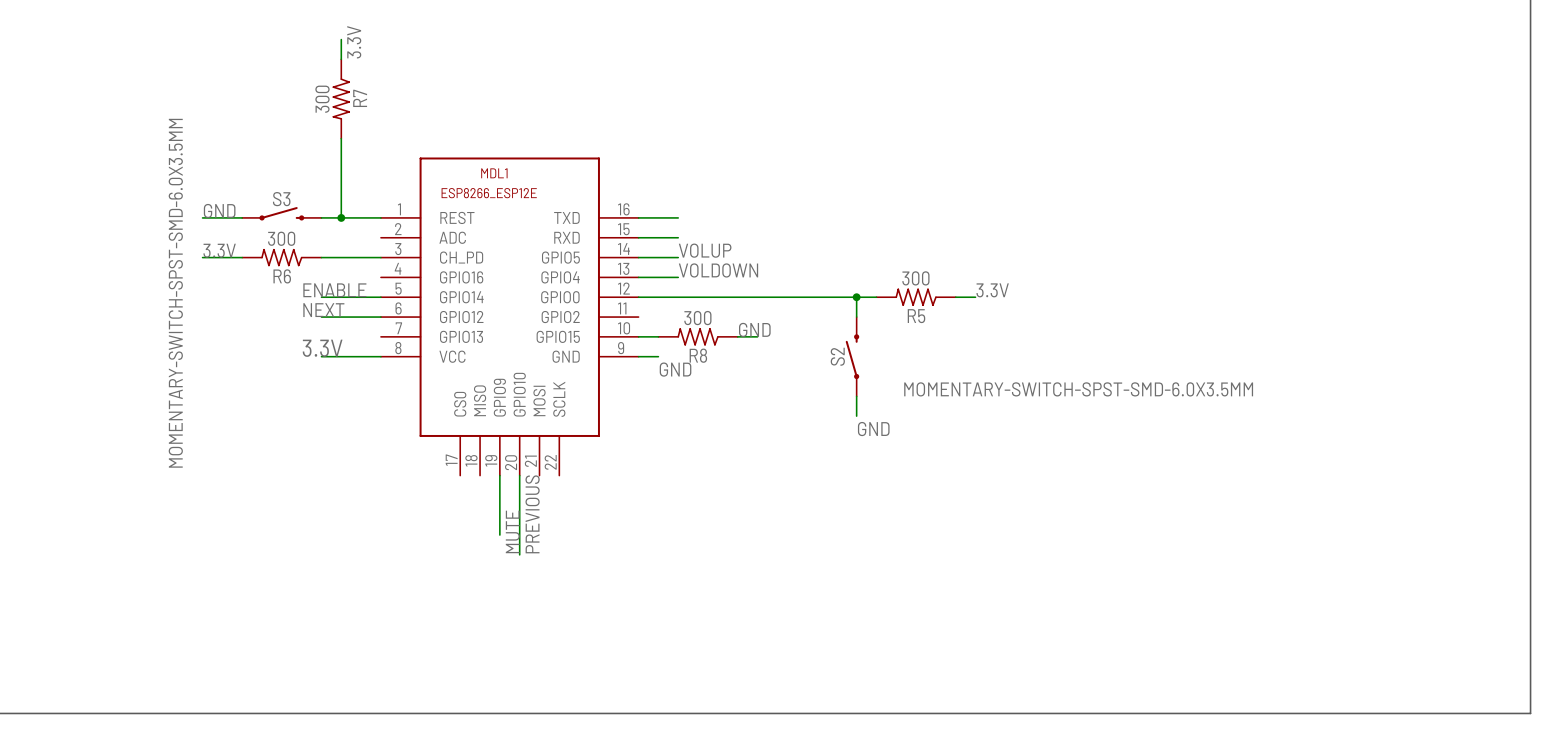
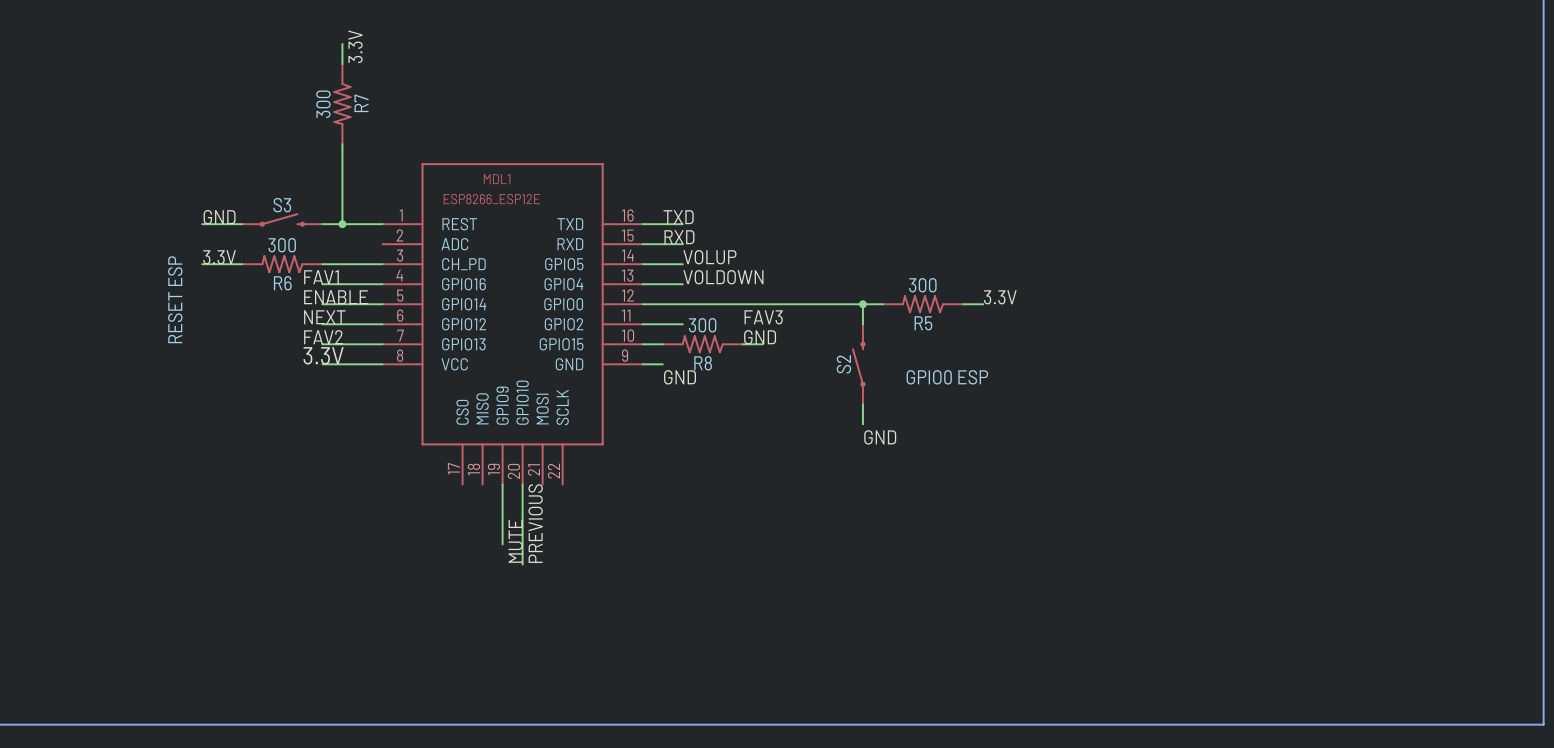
label: none -> TXD (678, 217)
label: none -> RXD (679, 237)
label: none -> FAV1 (321, 277)
wire: none -> (322, 284) (382, 284)
S3 value: MOMENTARY-SWITCH-SPST-SMD-6.0X3.5MM (175, 293) -> RESET ESP (175, 299)
label: none -> FAV3 (763, 317)
wire: none -> (642, 324) (682, 324)
label: none -> FAV2 (323, 337)
wire: none -> (322, 344) (382, 344)
S2 value: MOMENTARY-SWITCH-SPST-SMD-6.0X3.5MM (1078, 389) -> GPIO0 ESP (947, 377)

